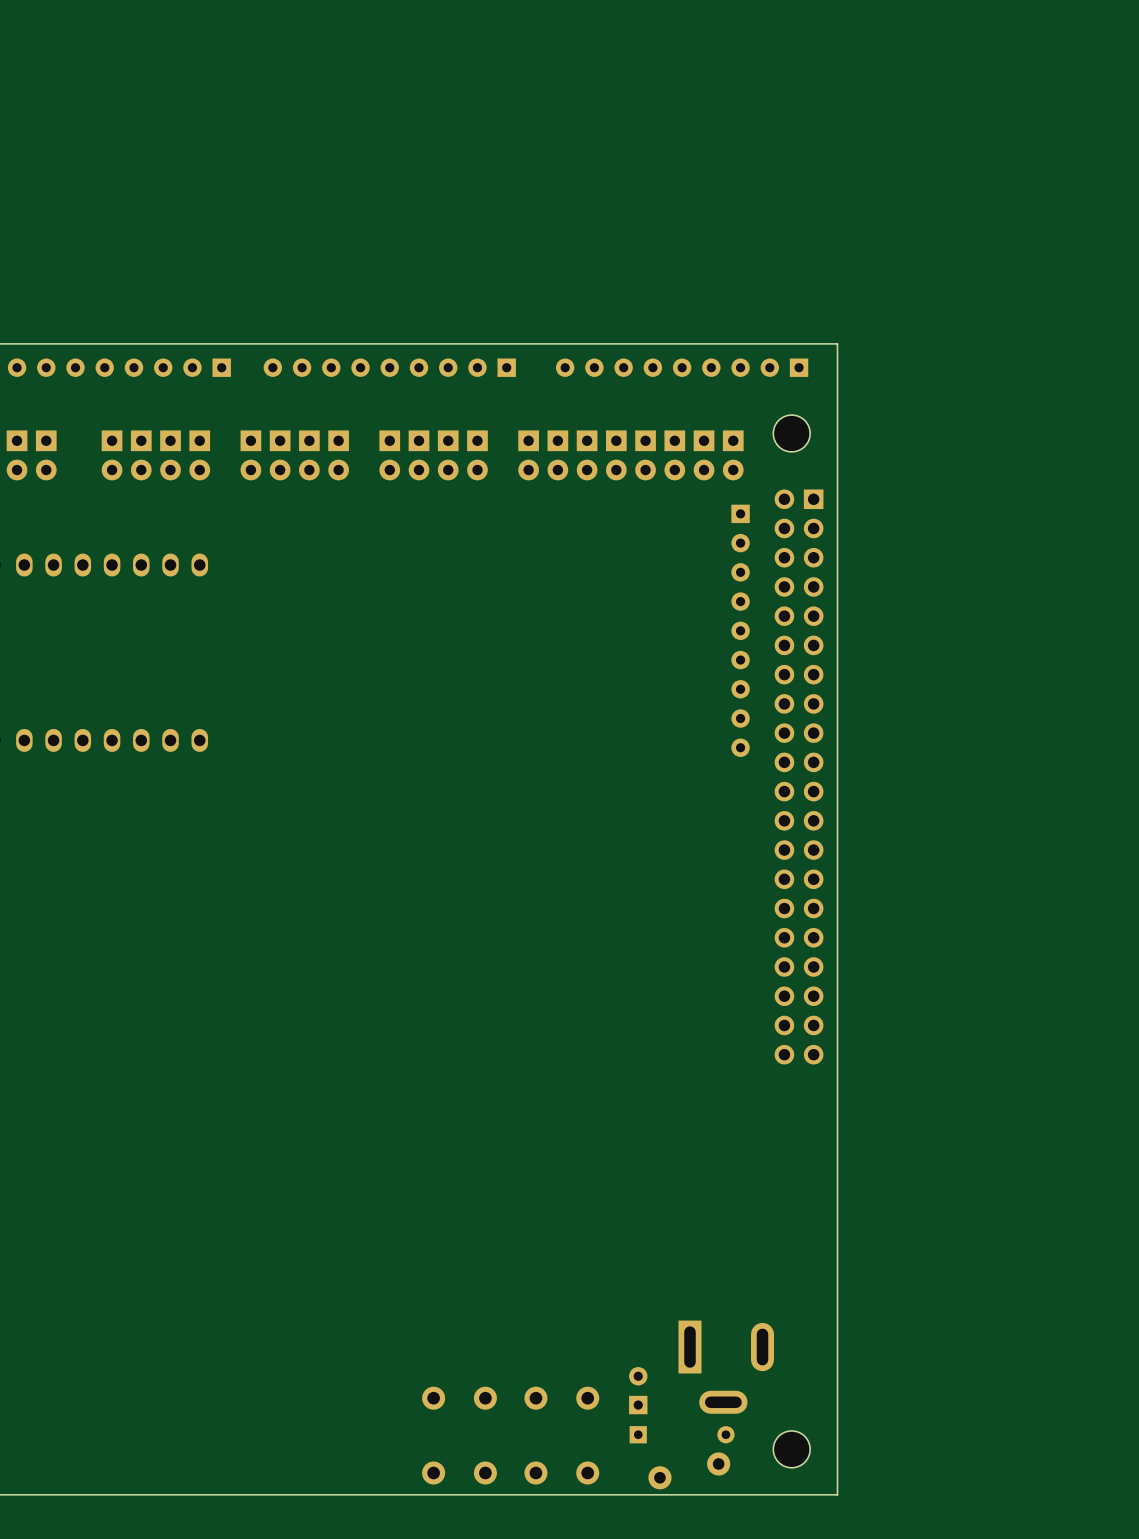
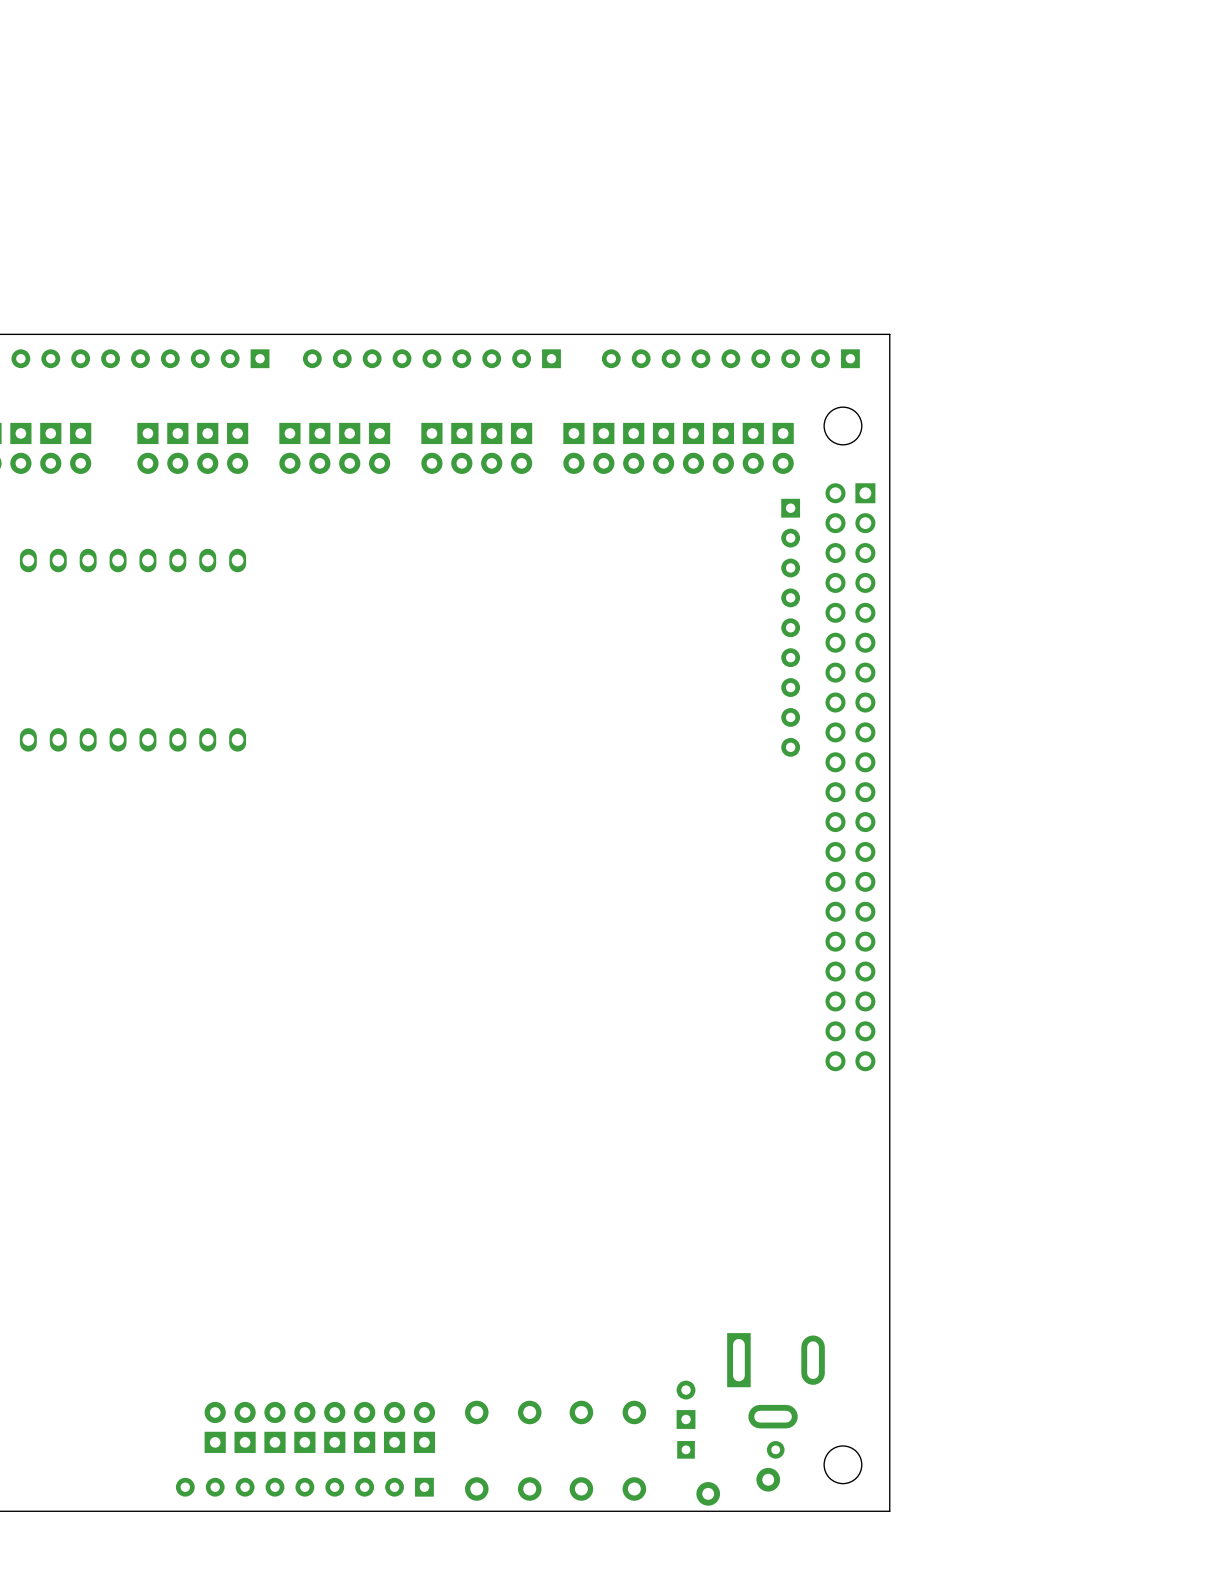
part: none -> (215, 1427)
part: none -> (245, 1427)
part: none -> (274, 1427)
part: none -> (304, 1427)
part: none -> (334, 1427)
part: none -> (364, 1427)
part: none -> (394, 1427)
part: none -> (424, 1427)
part: none -> (304, 1487)

